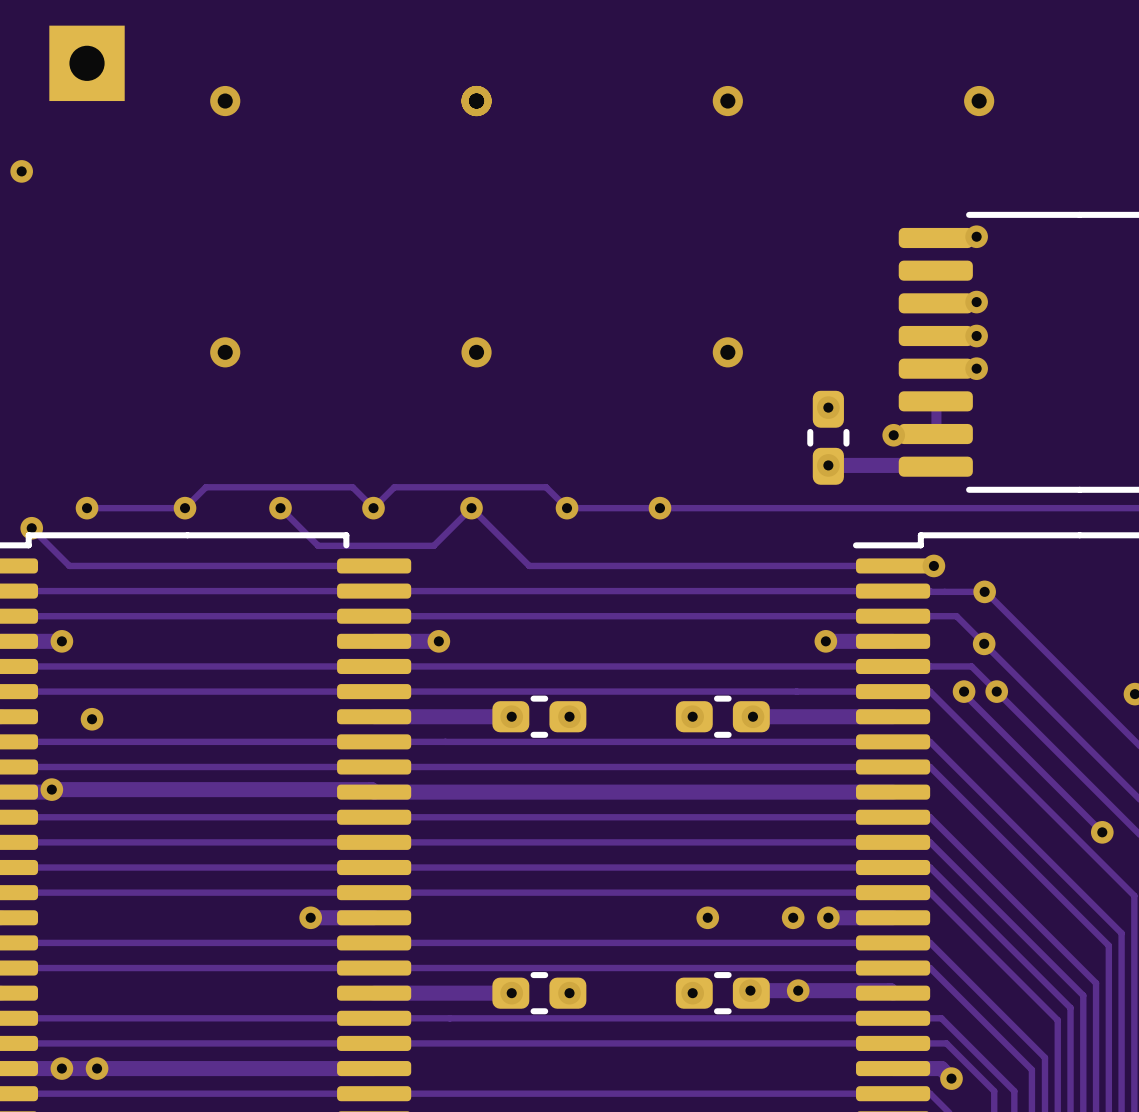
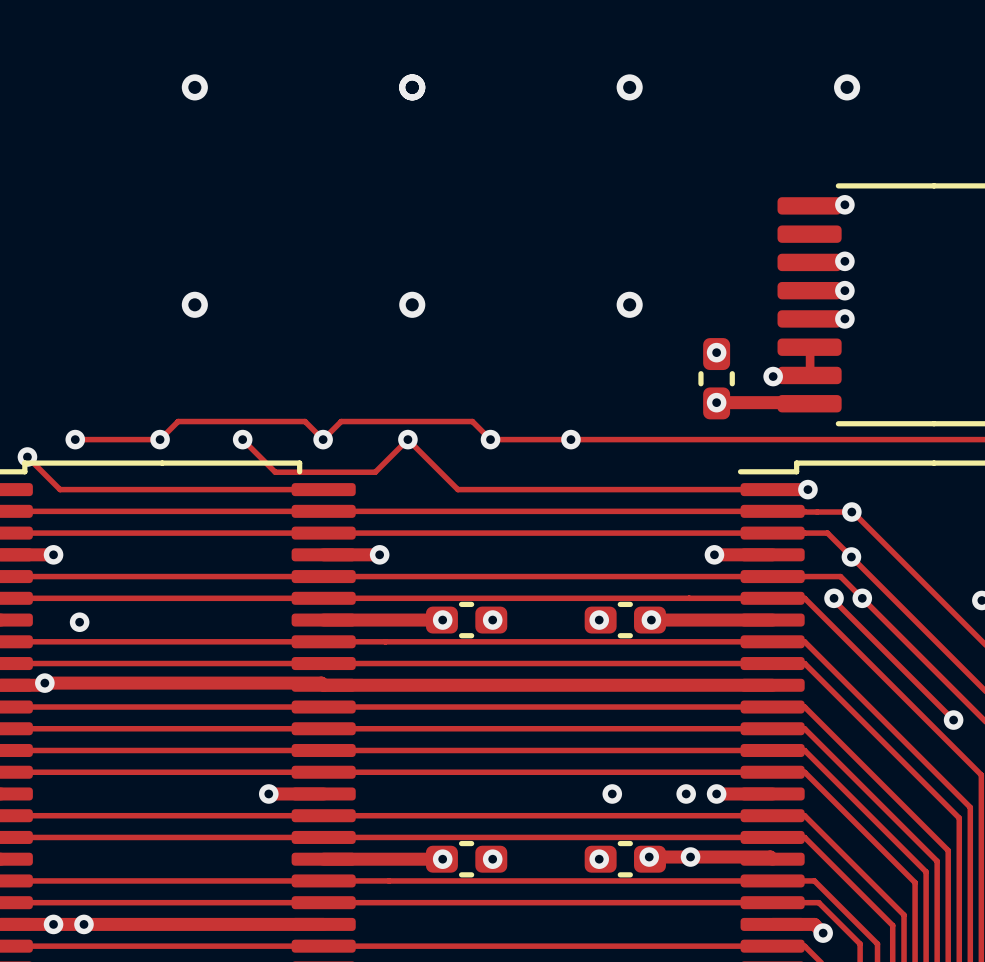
part: (87, 63) -> none
via: (21, 171) -> none

